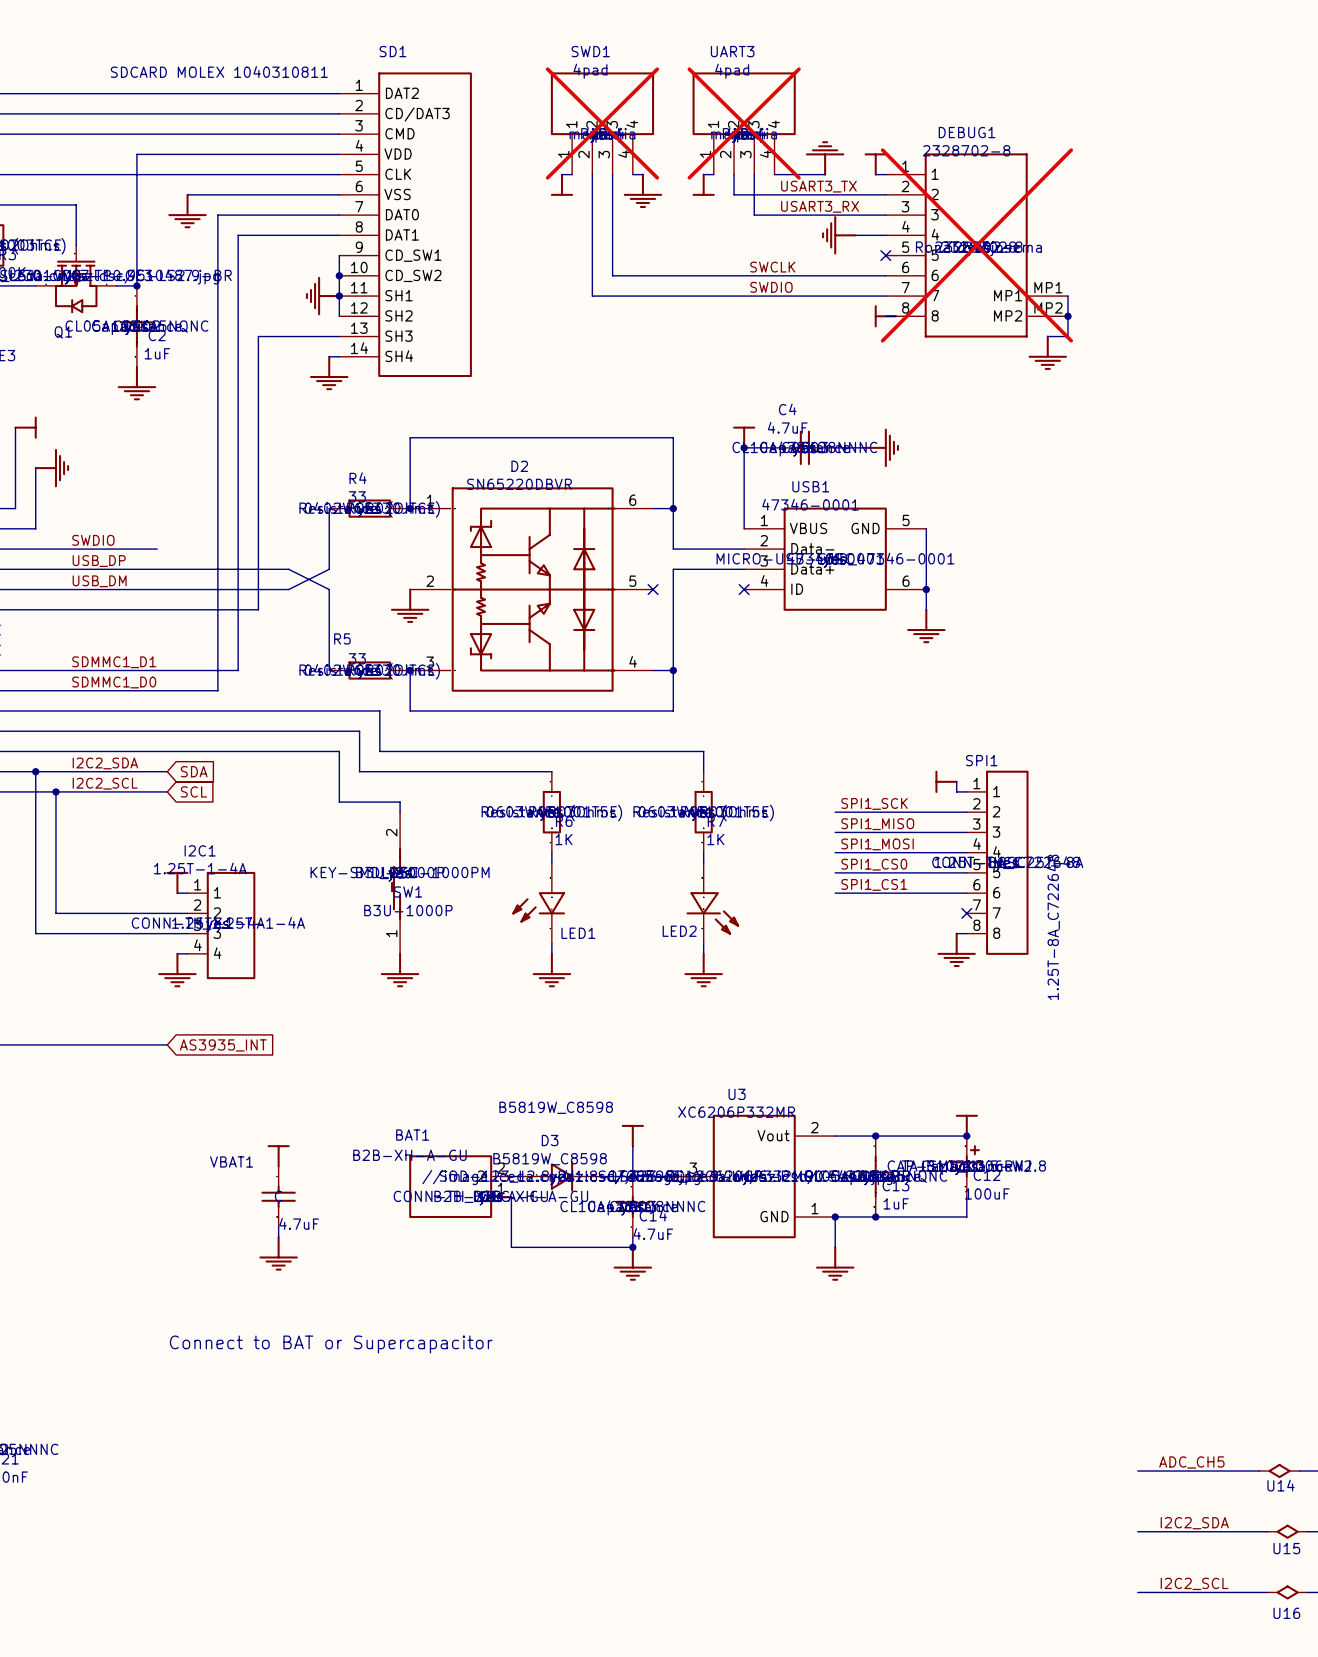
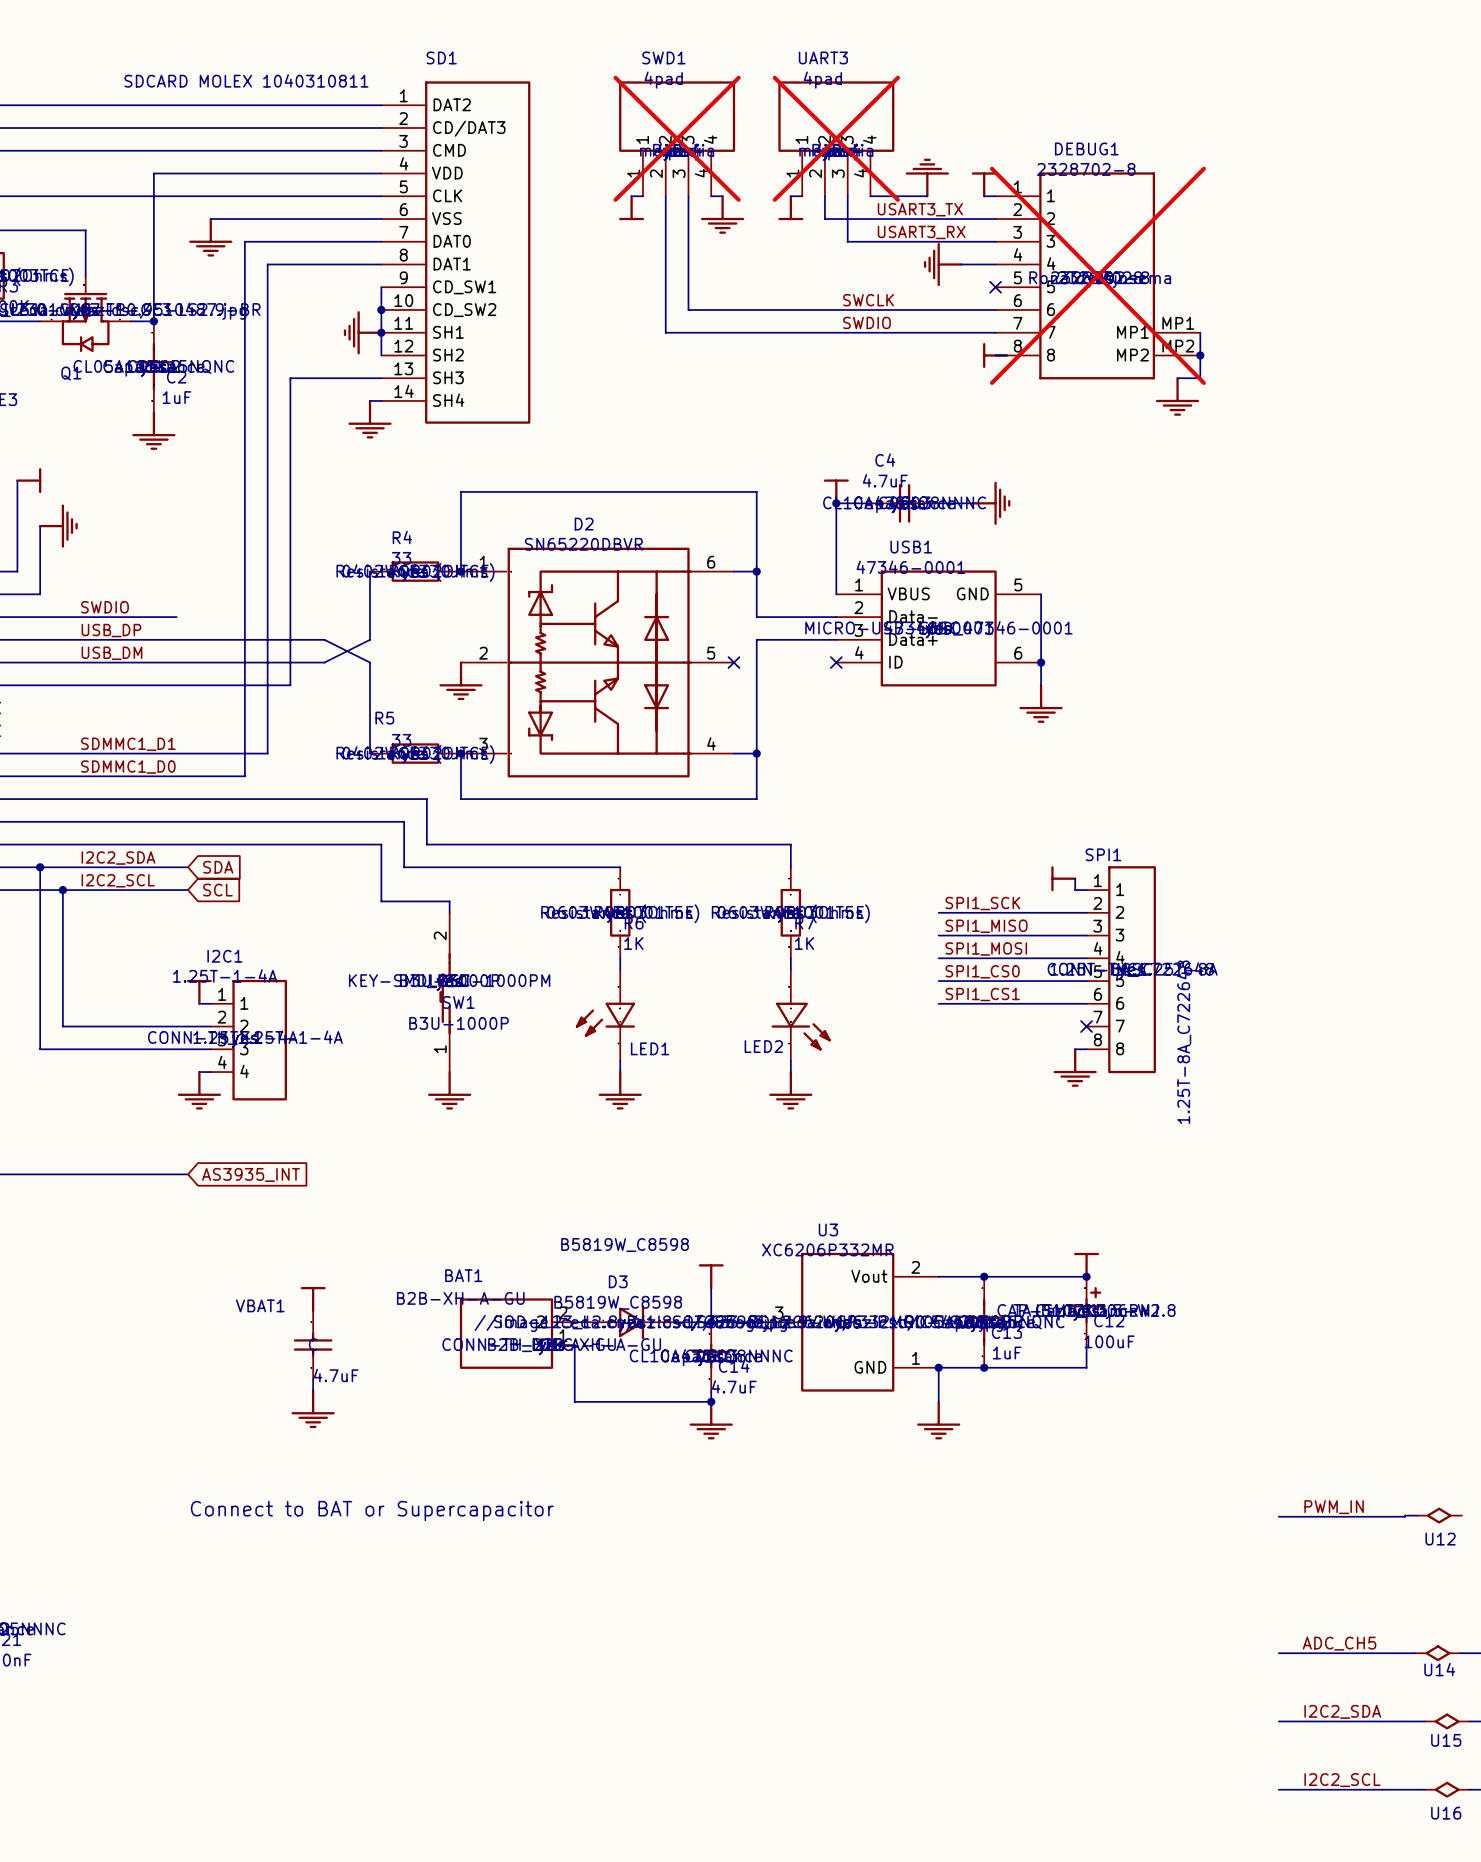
label: none -> PWM_IN (1334, 1507)
wire: none -> (1416, 1515) (1278, 1516)
U12: none -> (1439, 1515)

